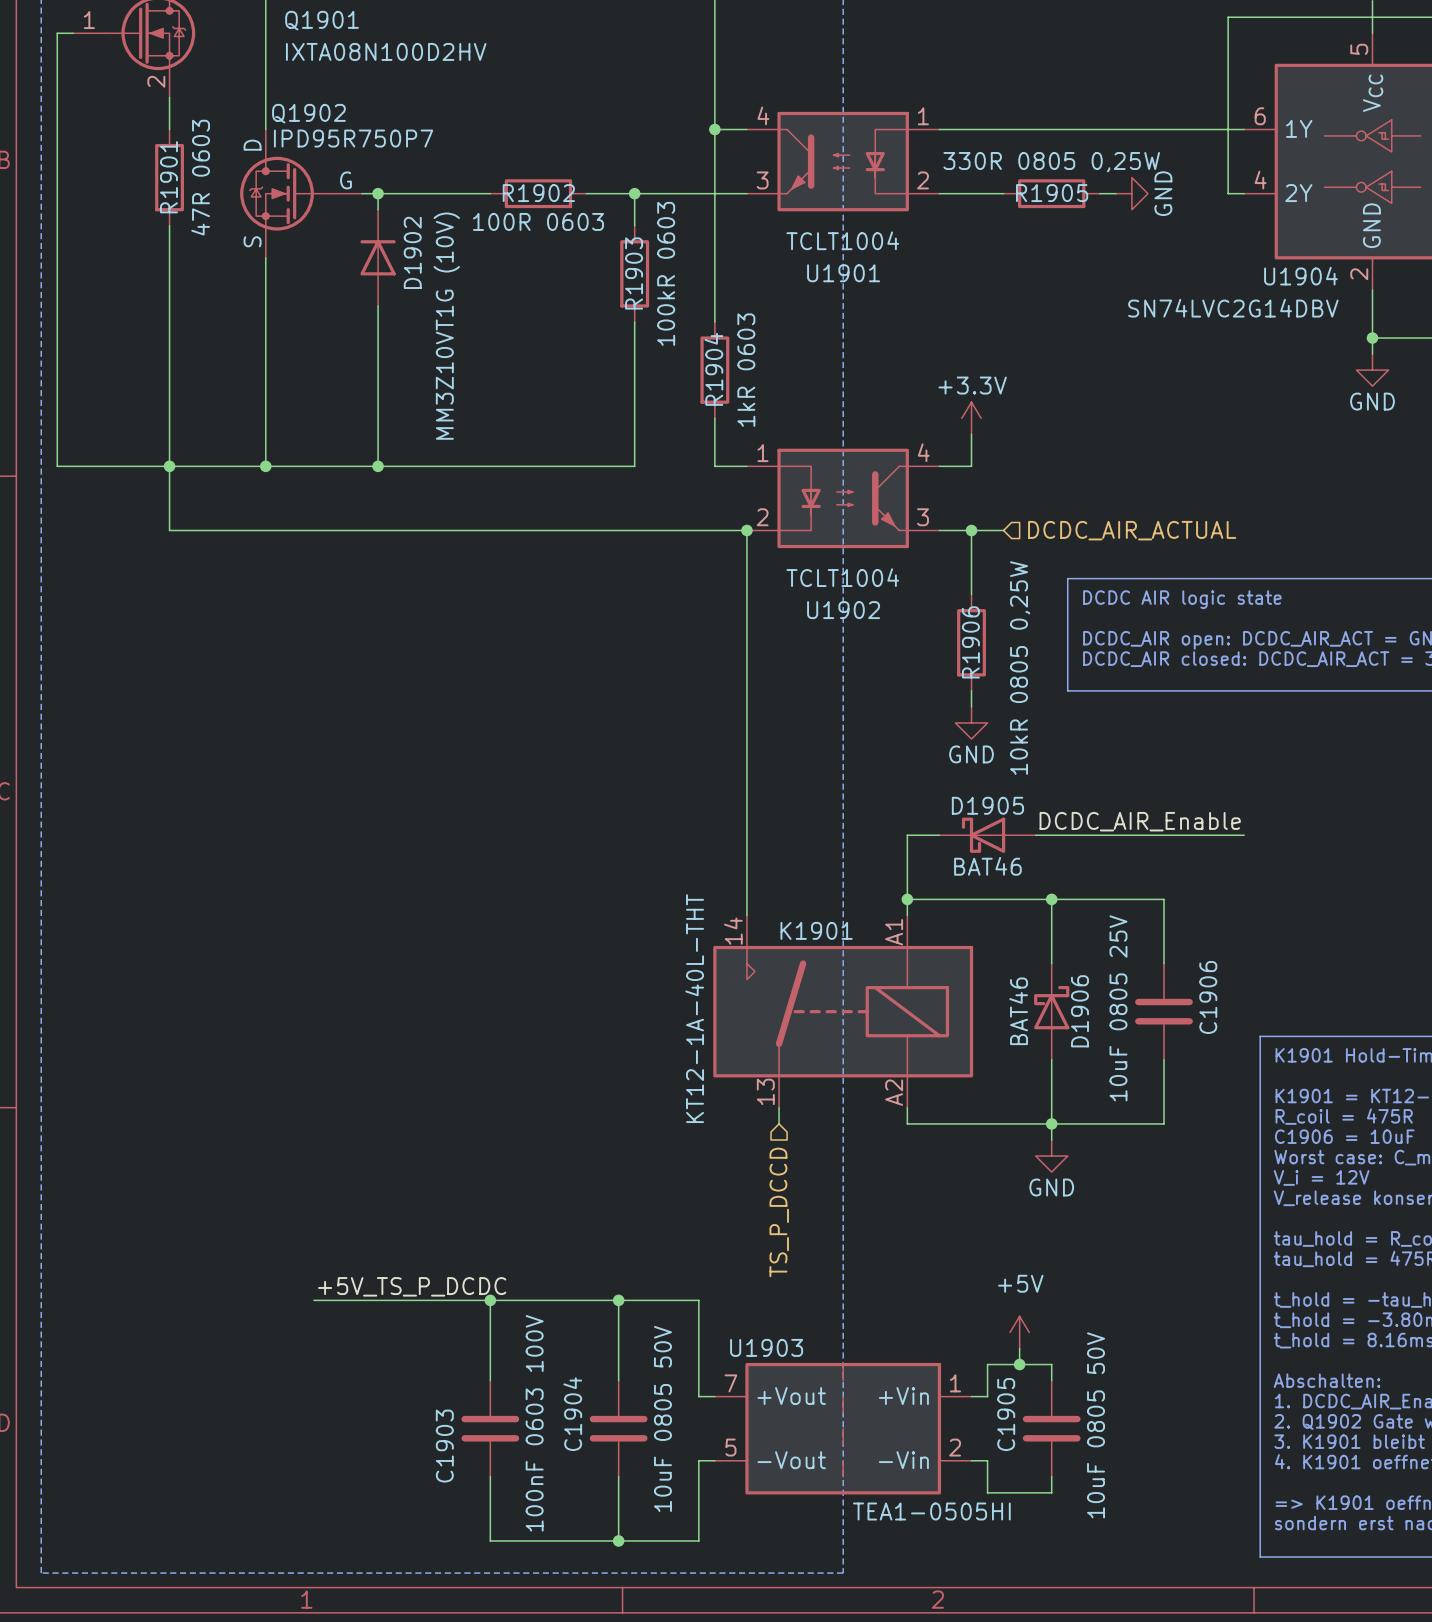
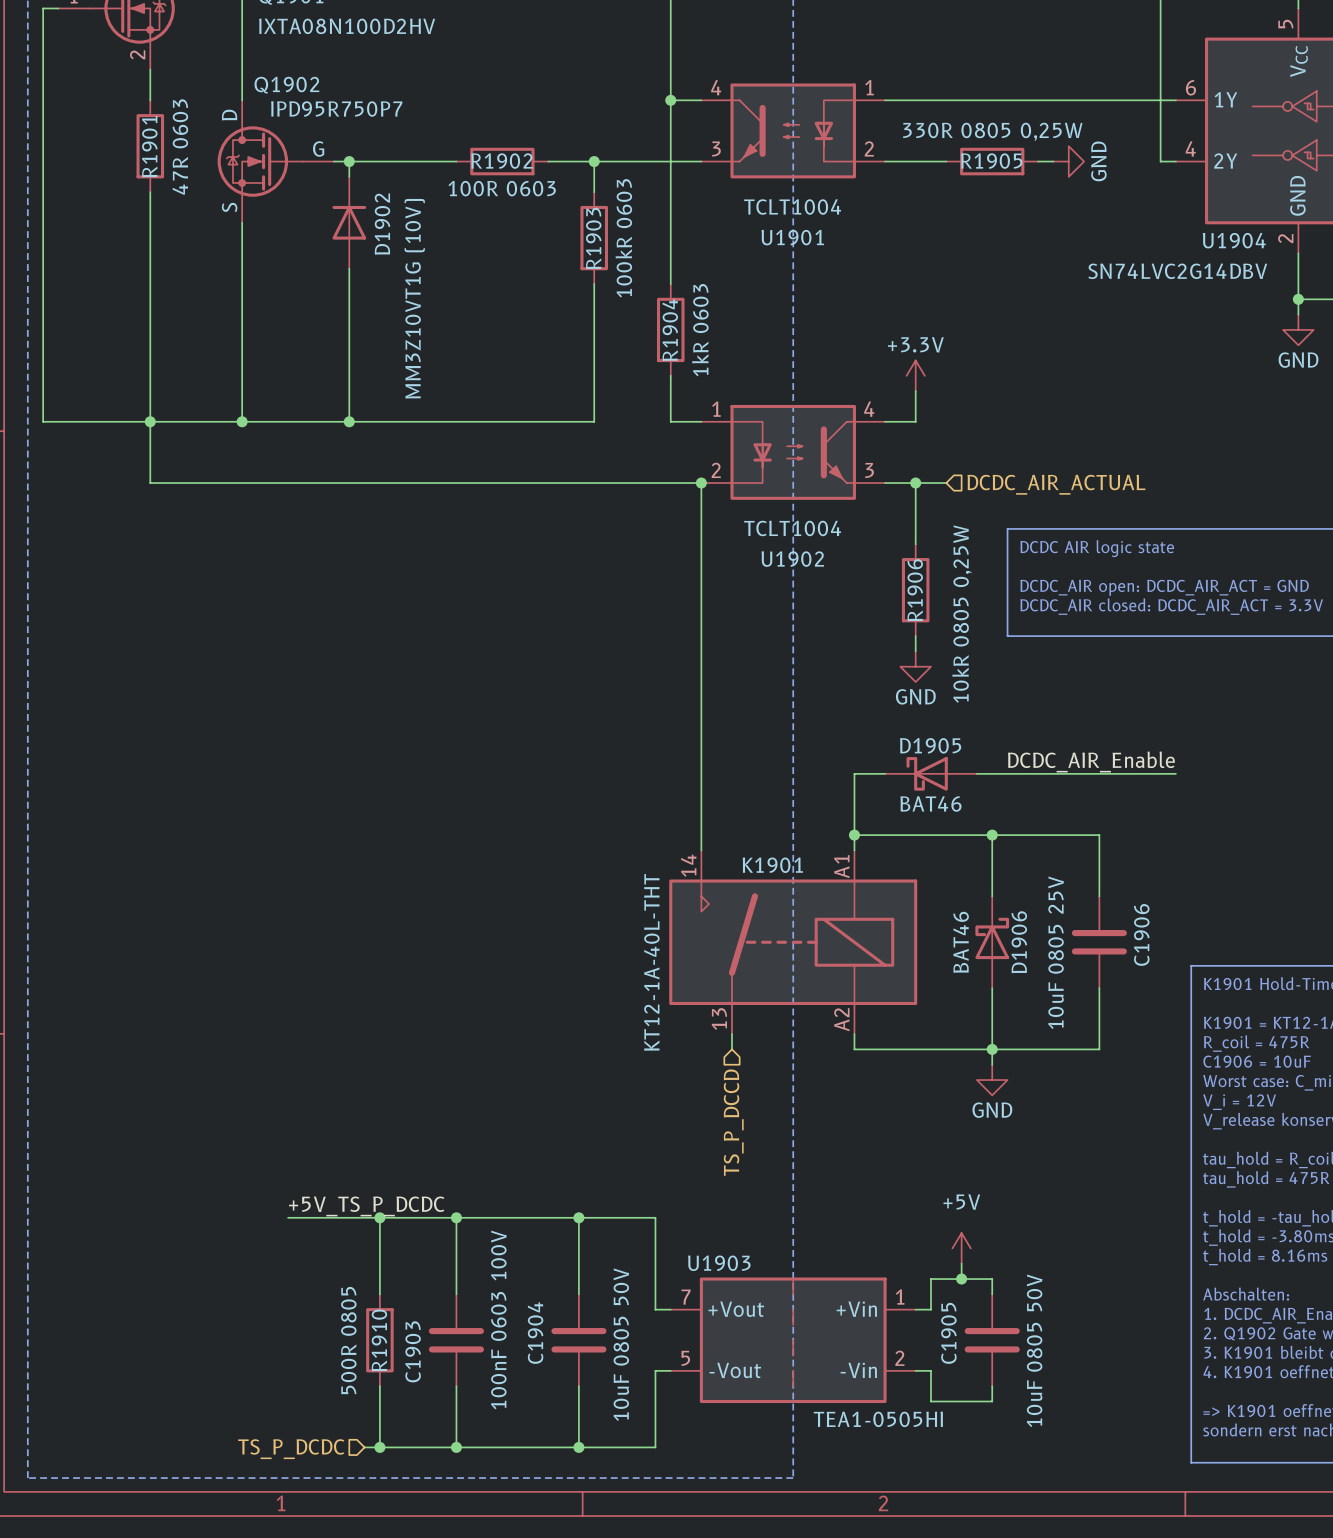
wire: none -> (379, 1217) (379, 1294)
junction: none -> (379, 1217)
R1910: none -> 500R 0805 (379, 1340)
wire: none -> (379, 1386) (379, 1447)
wire: none -> (364, 1447) (456, 1447)
junction: none -> (379, 1447)
junction: none -> (456, 1447)
hierarchical label: none -> TS_P_DCDC (291, 1449)

